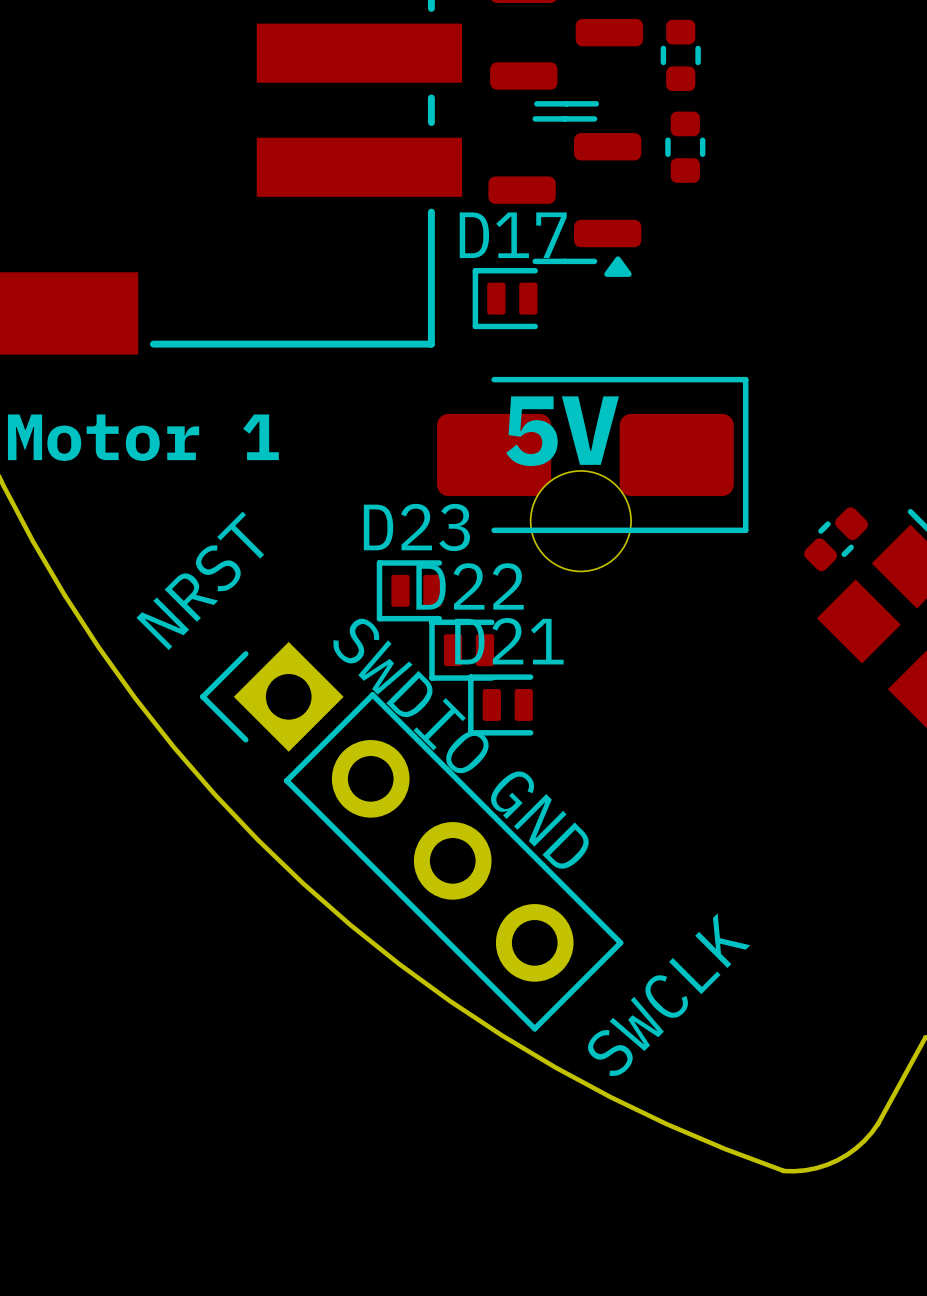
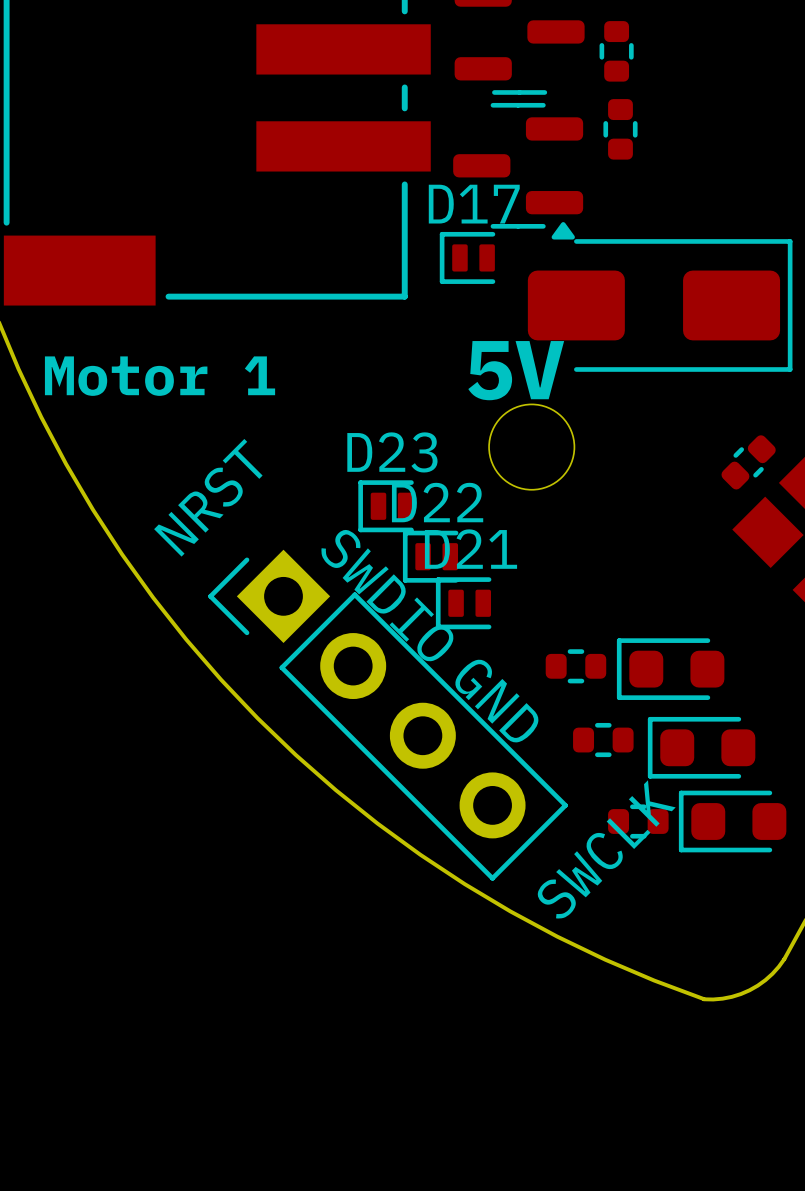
part position: (592, 454) -> (660, 305)
part: none -> (575, 666)
part: none -> (670, 669)
part: none -> (603, 740)
part: none -> (701, 747)
part: none -> (638, 821)
part: none -> (732, 821)

